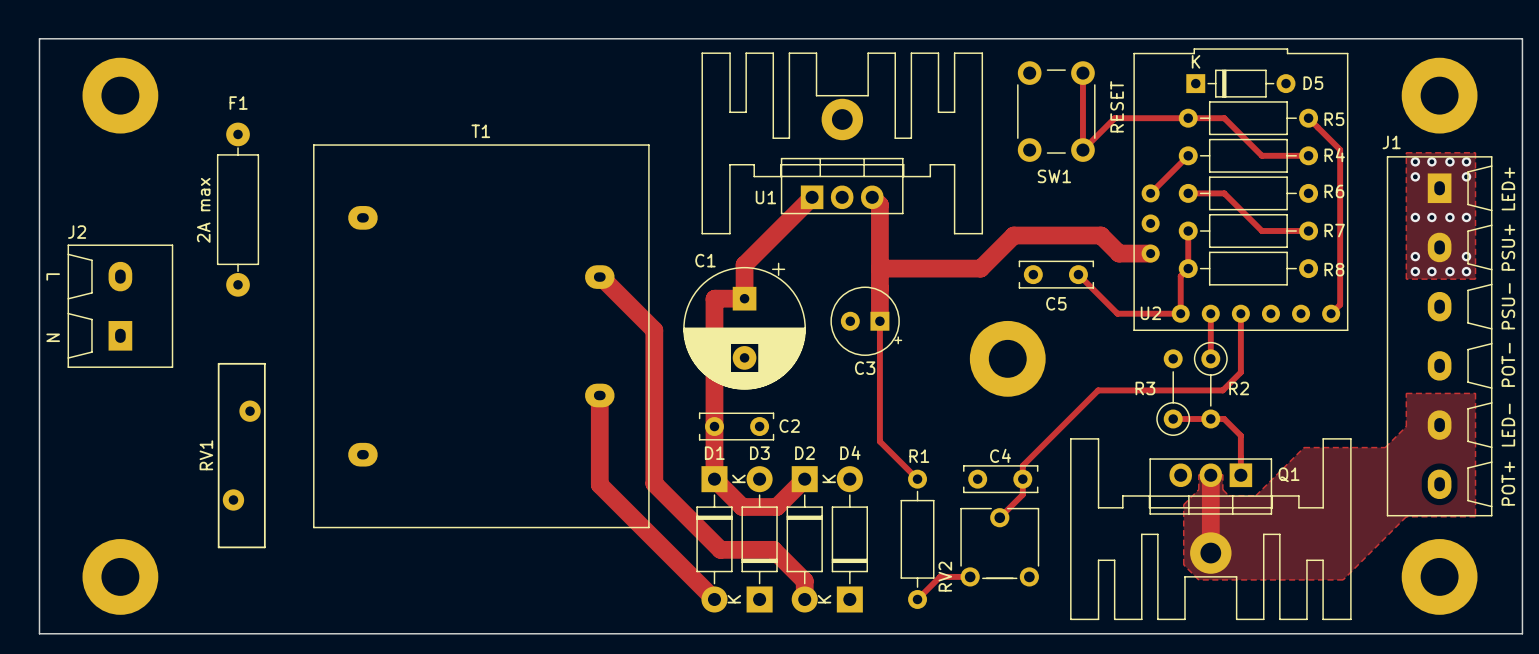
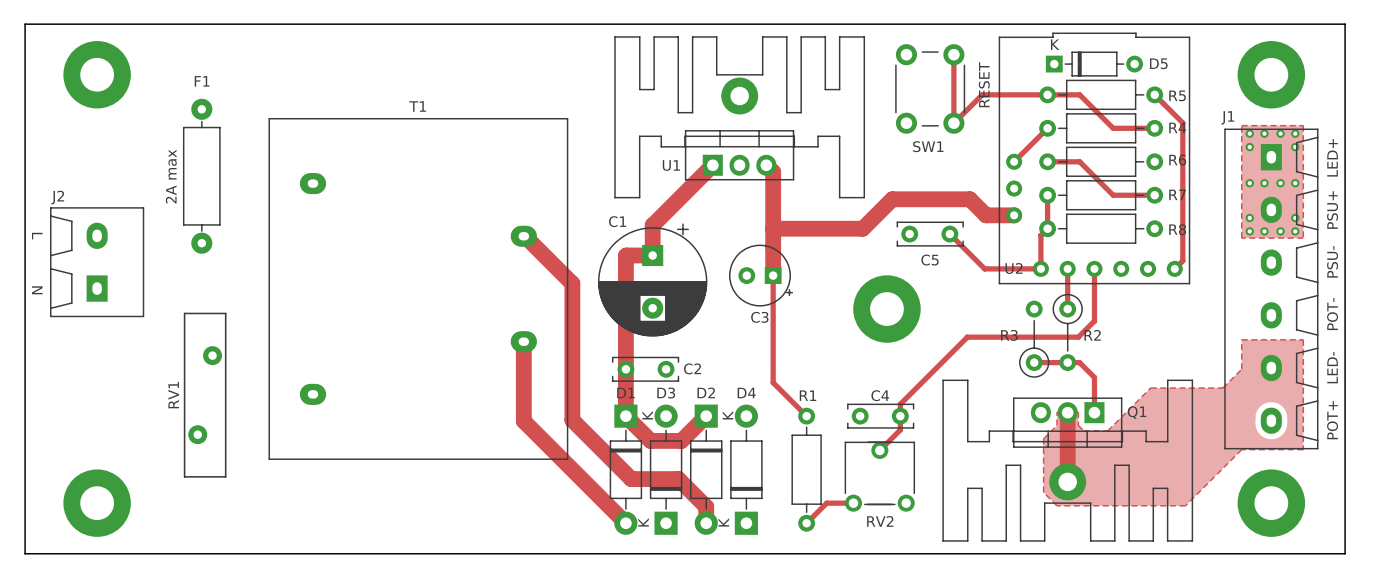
RV2 footprint: [960, 507, 1040, 587] -> [844, 441, 915, 512]
RV2 name rotation: 0° (945, 576) -> 90° clockwise (880, 521)
RV2 name position: RV2 (945, 576) -> RV2 (880, 521)

